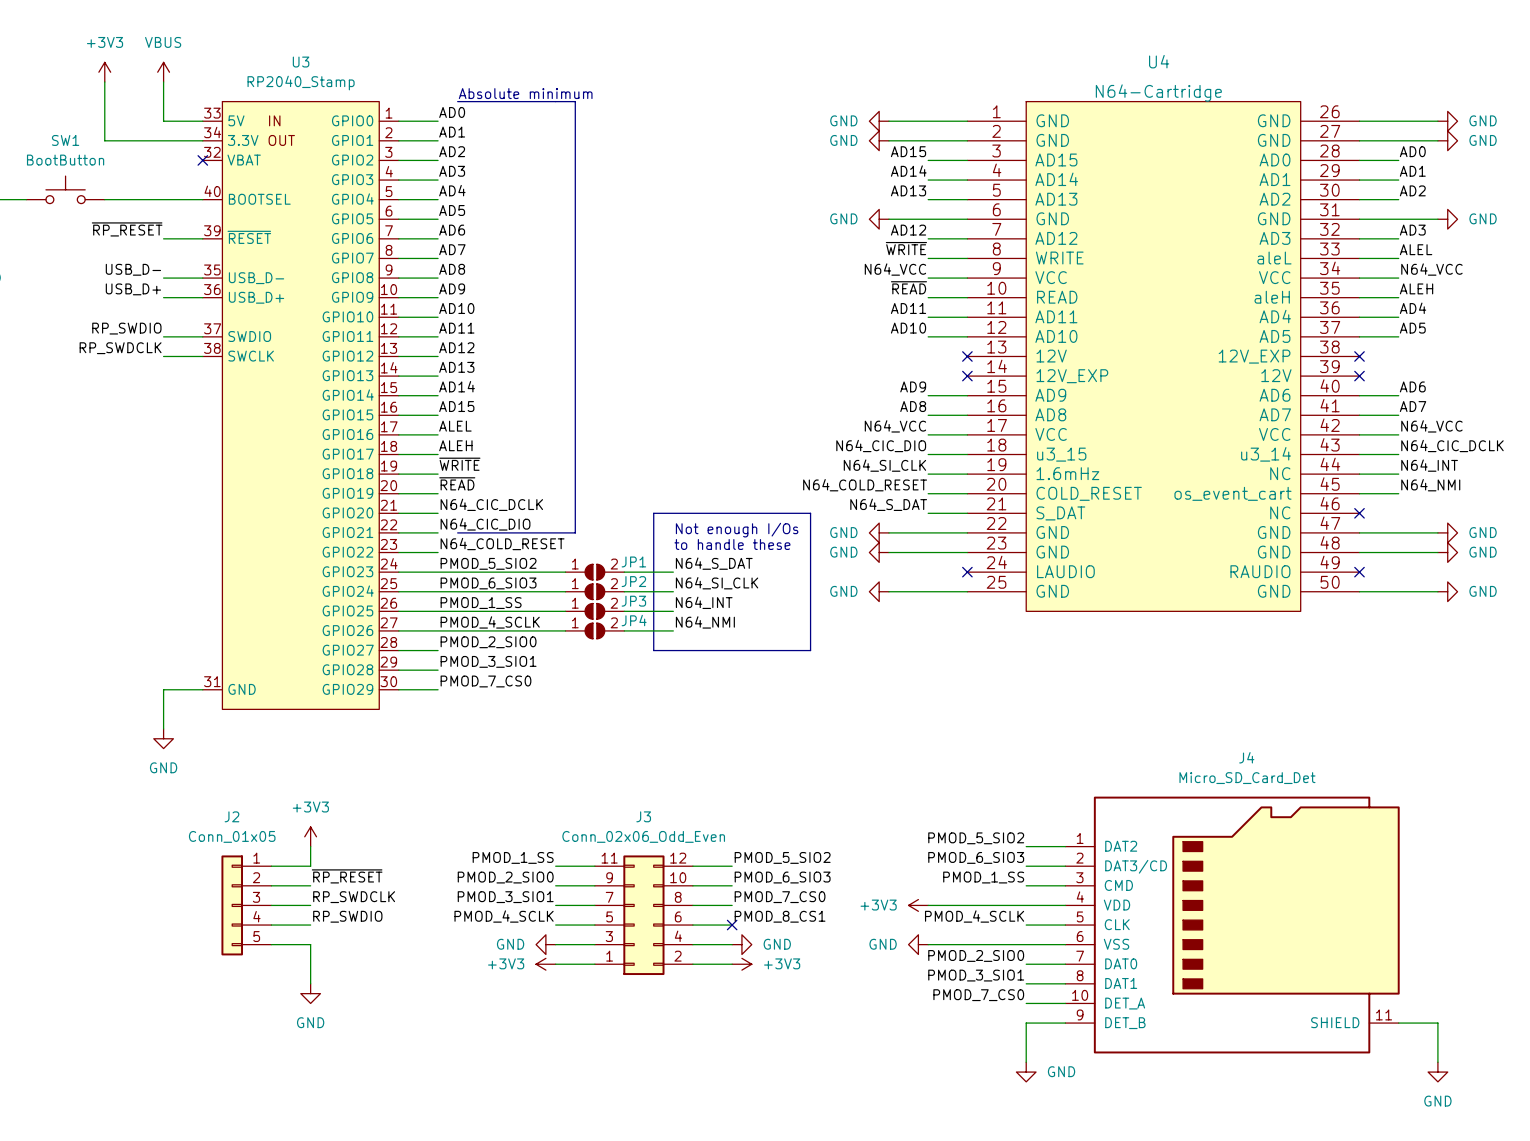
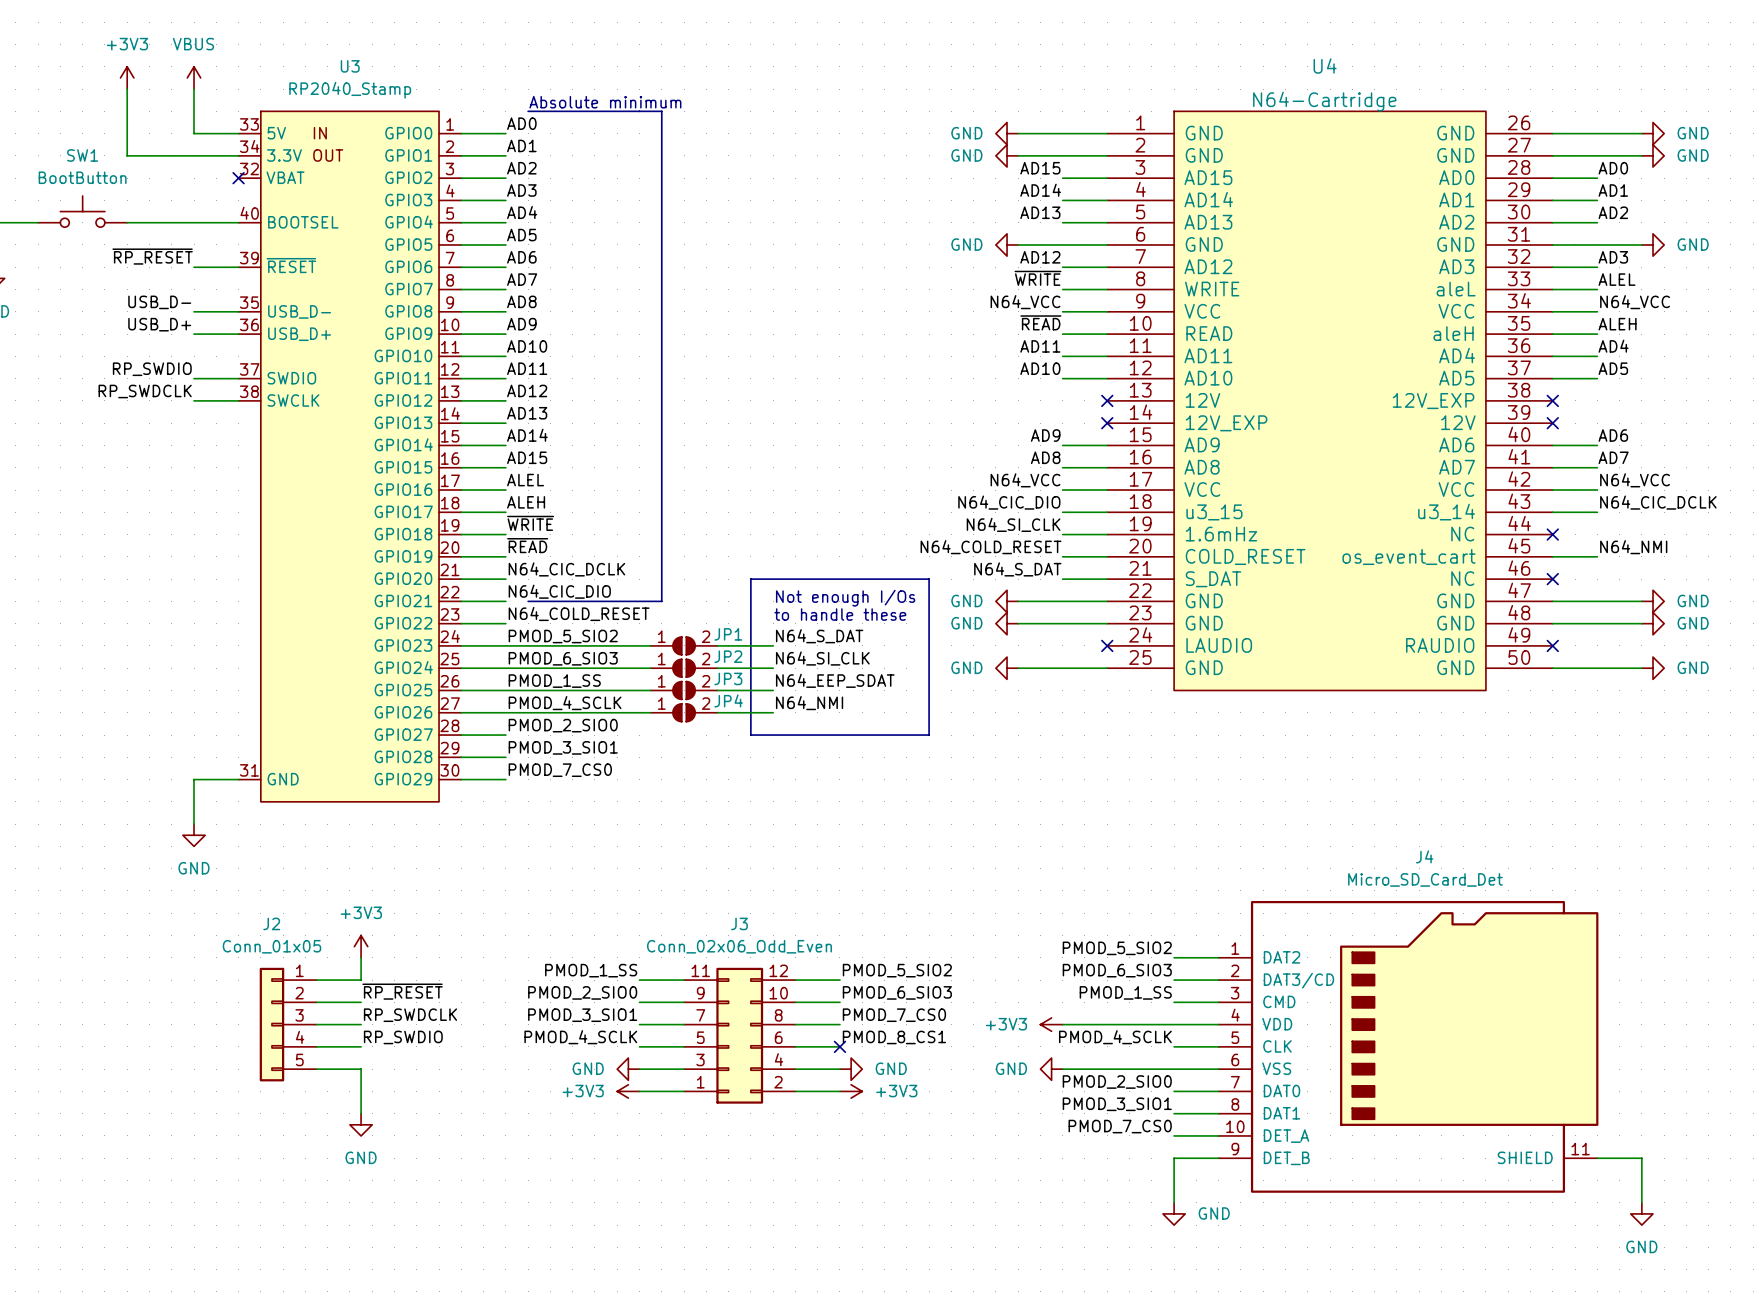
label: N64_INT (1429, 465) -> none
wire: (1359, 474) (1398, 474) -> none
no-connect mark: none -> (1552, 534)
label: N64_INT (704, 602) -> N64_EEP_SDAT (835, 680)

